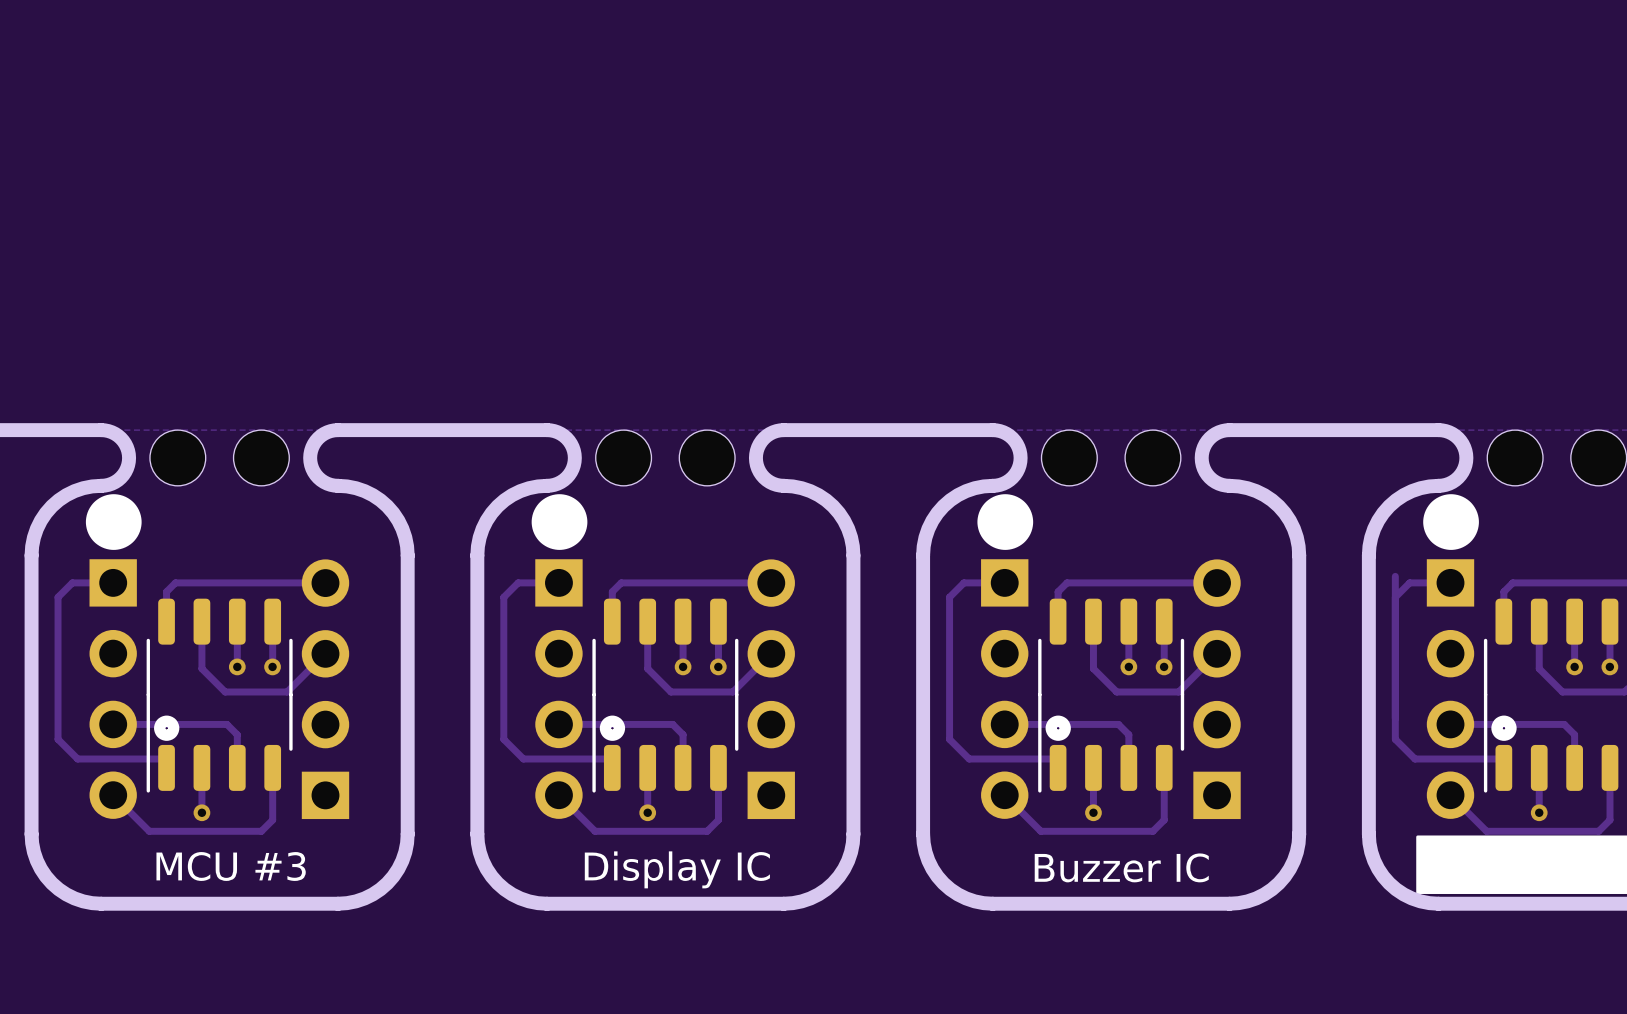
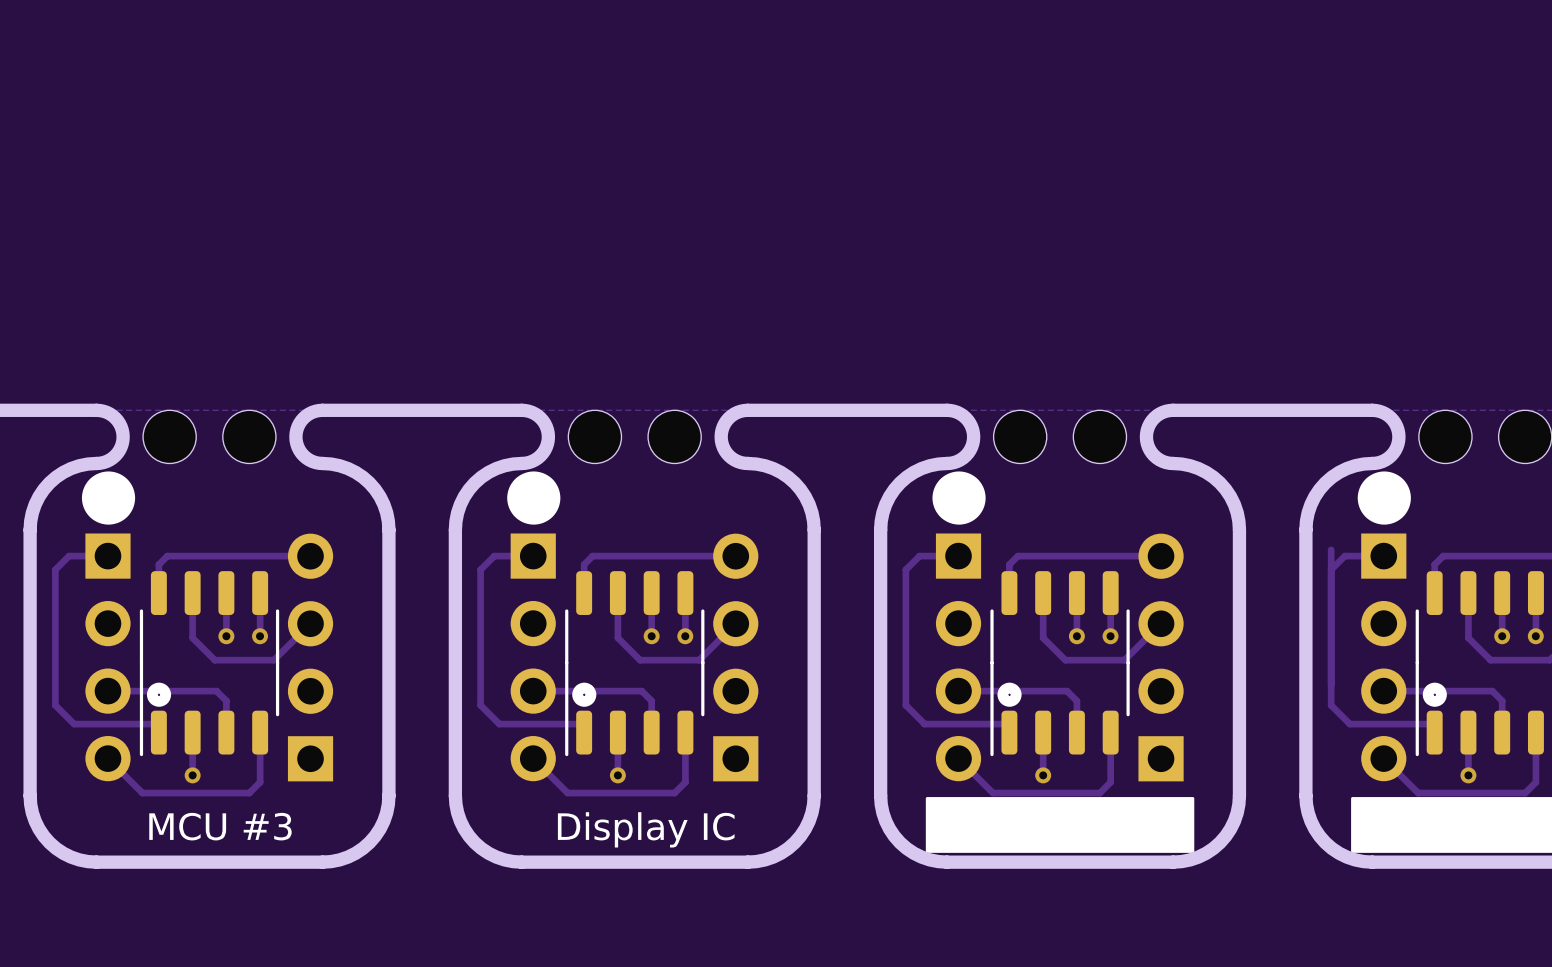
drawing: none -> [925, 797, 1195, 853]
text: Buzzer IC (1121, 867) -> none

